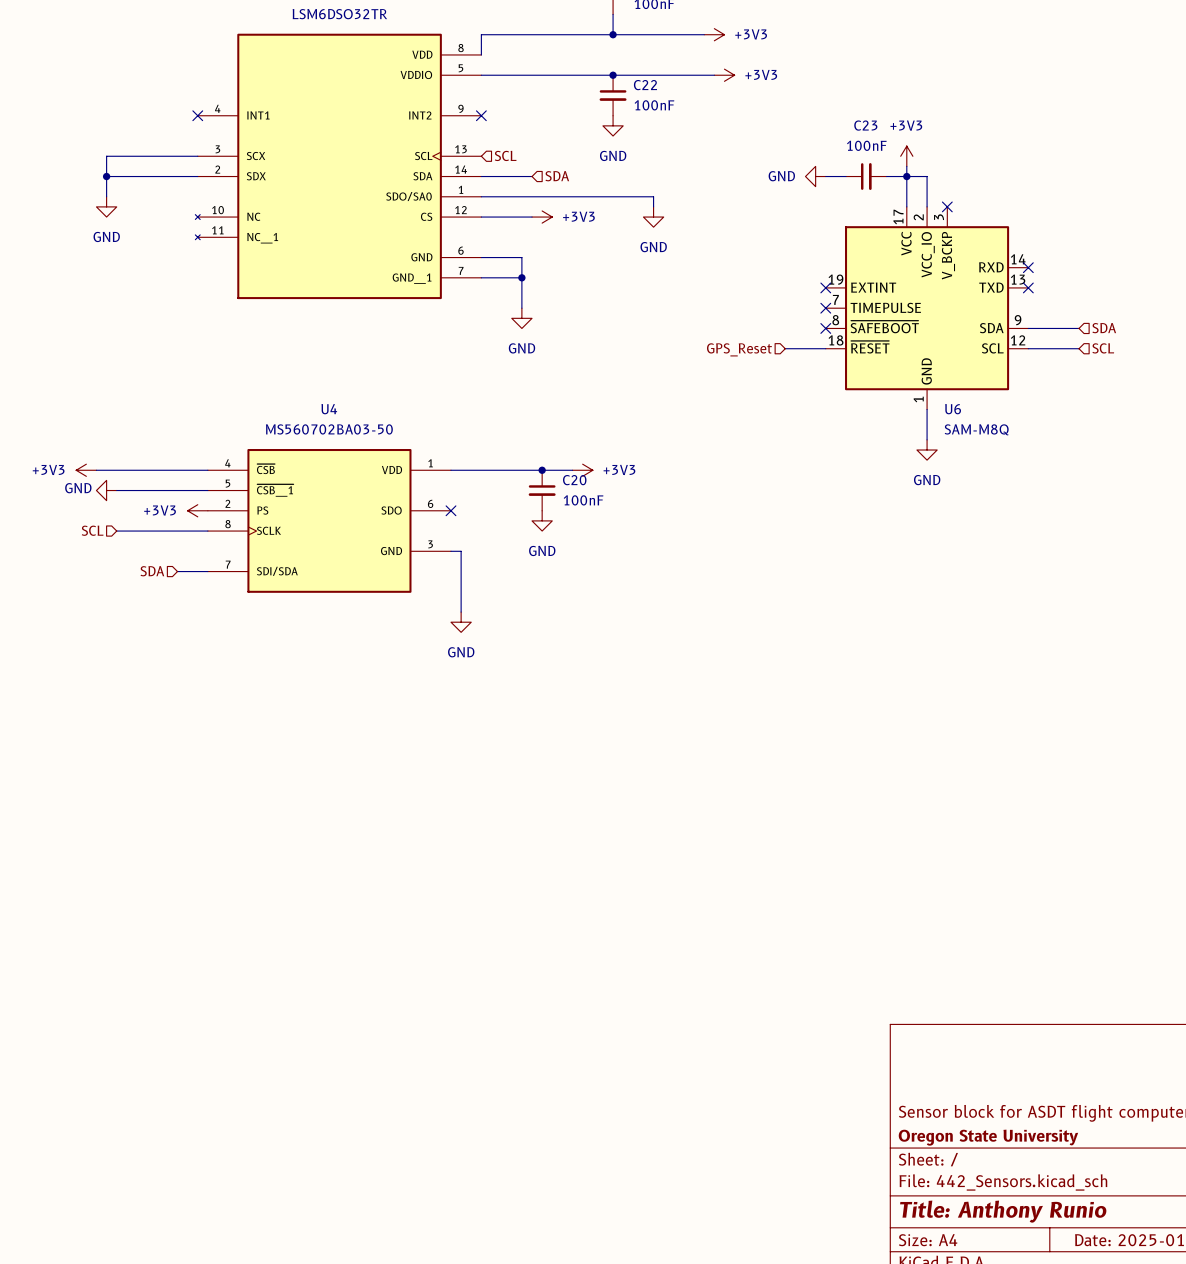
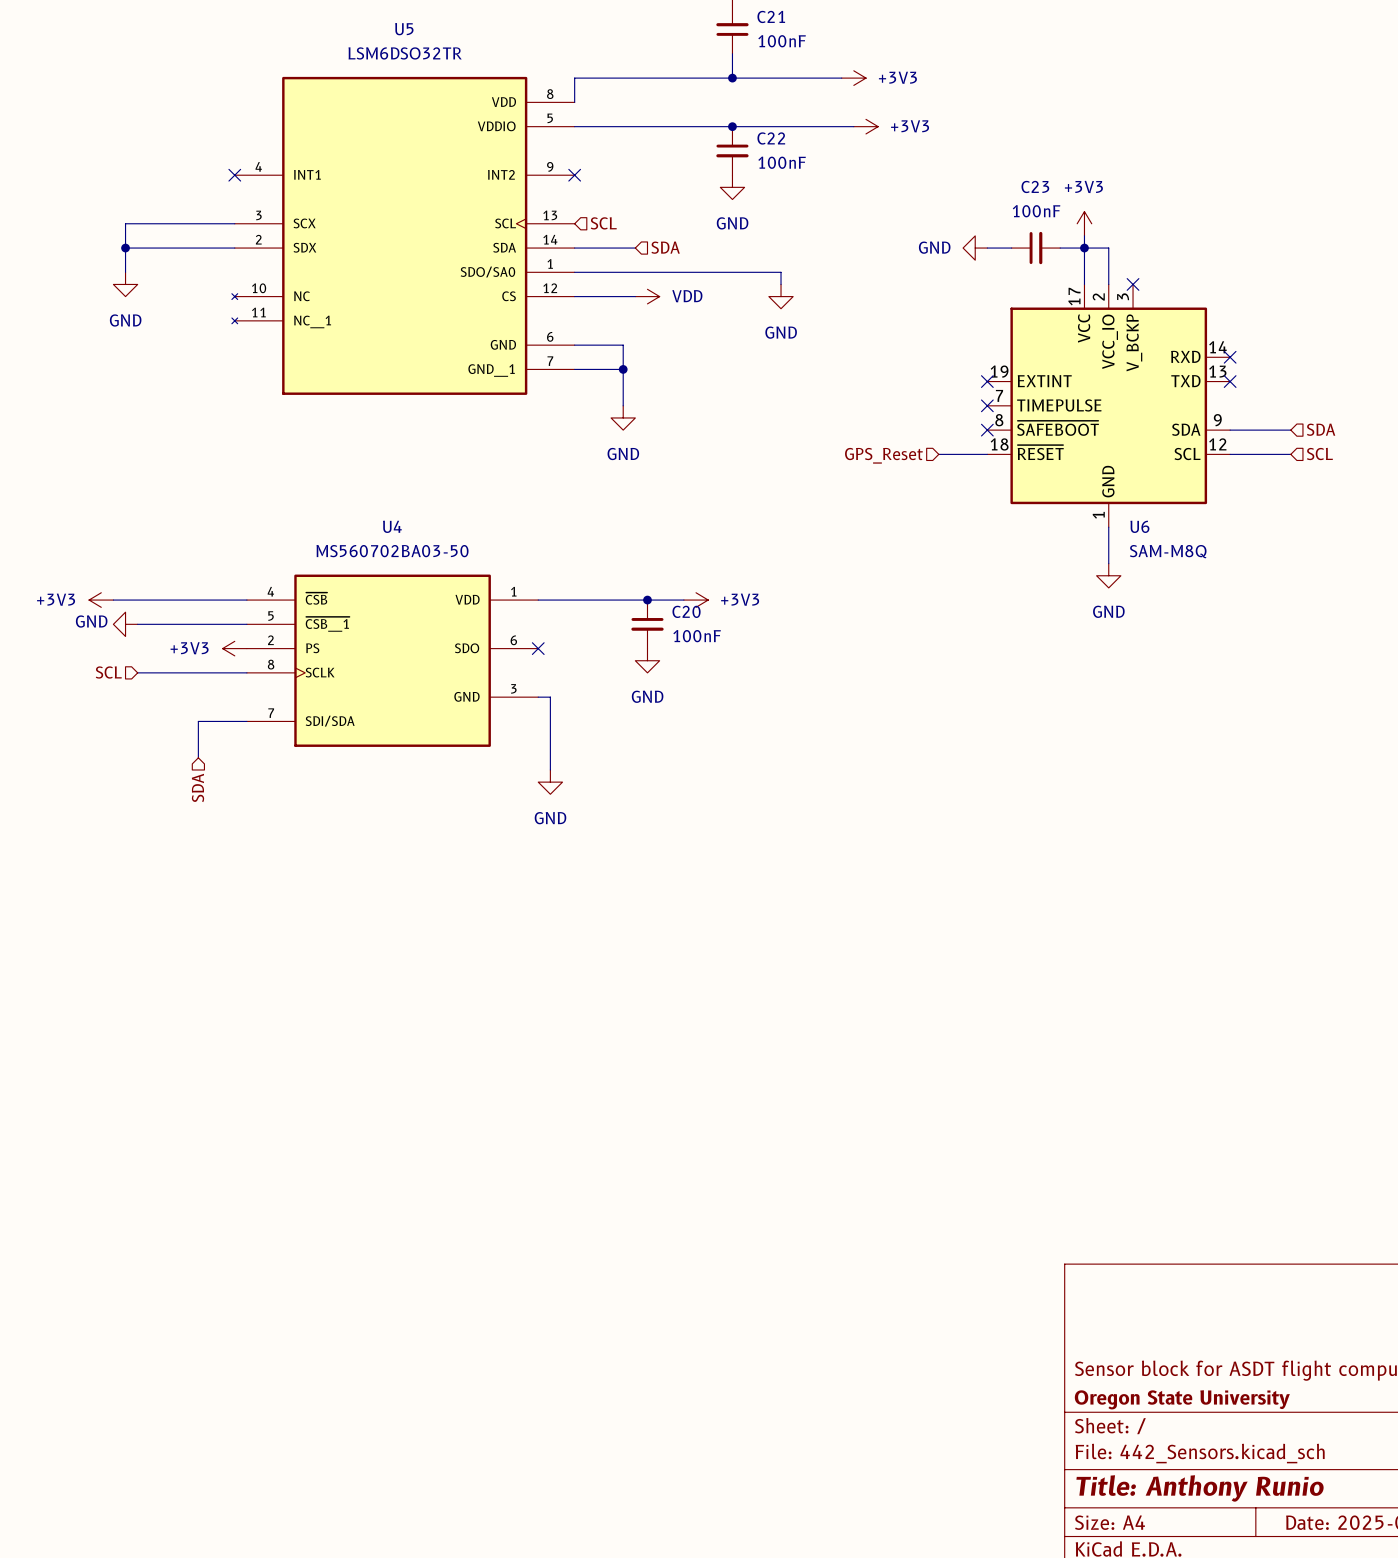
power symbol: +3V3 (542, 217) -> VDD (647, 296)
hierarchical label rotation: 0° (152, 571) -> 90° counterclockwise (197, 787)
hierarchical label position: SDA (152, 571) -> SDA (197, 787)
wire: none -> (210, 721) (198, 721) (198, 757)

